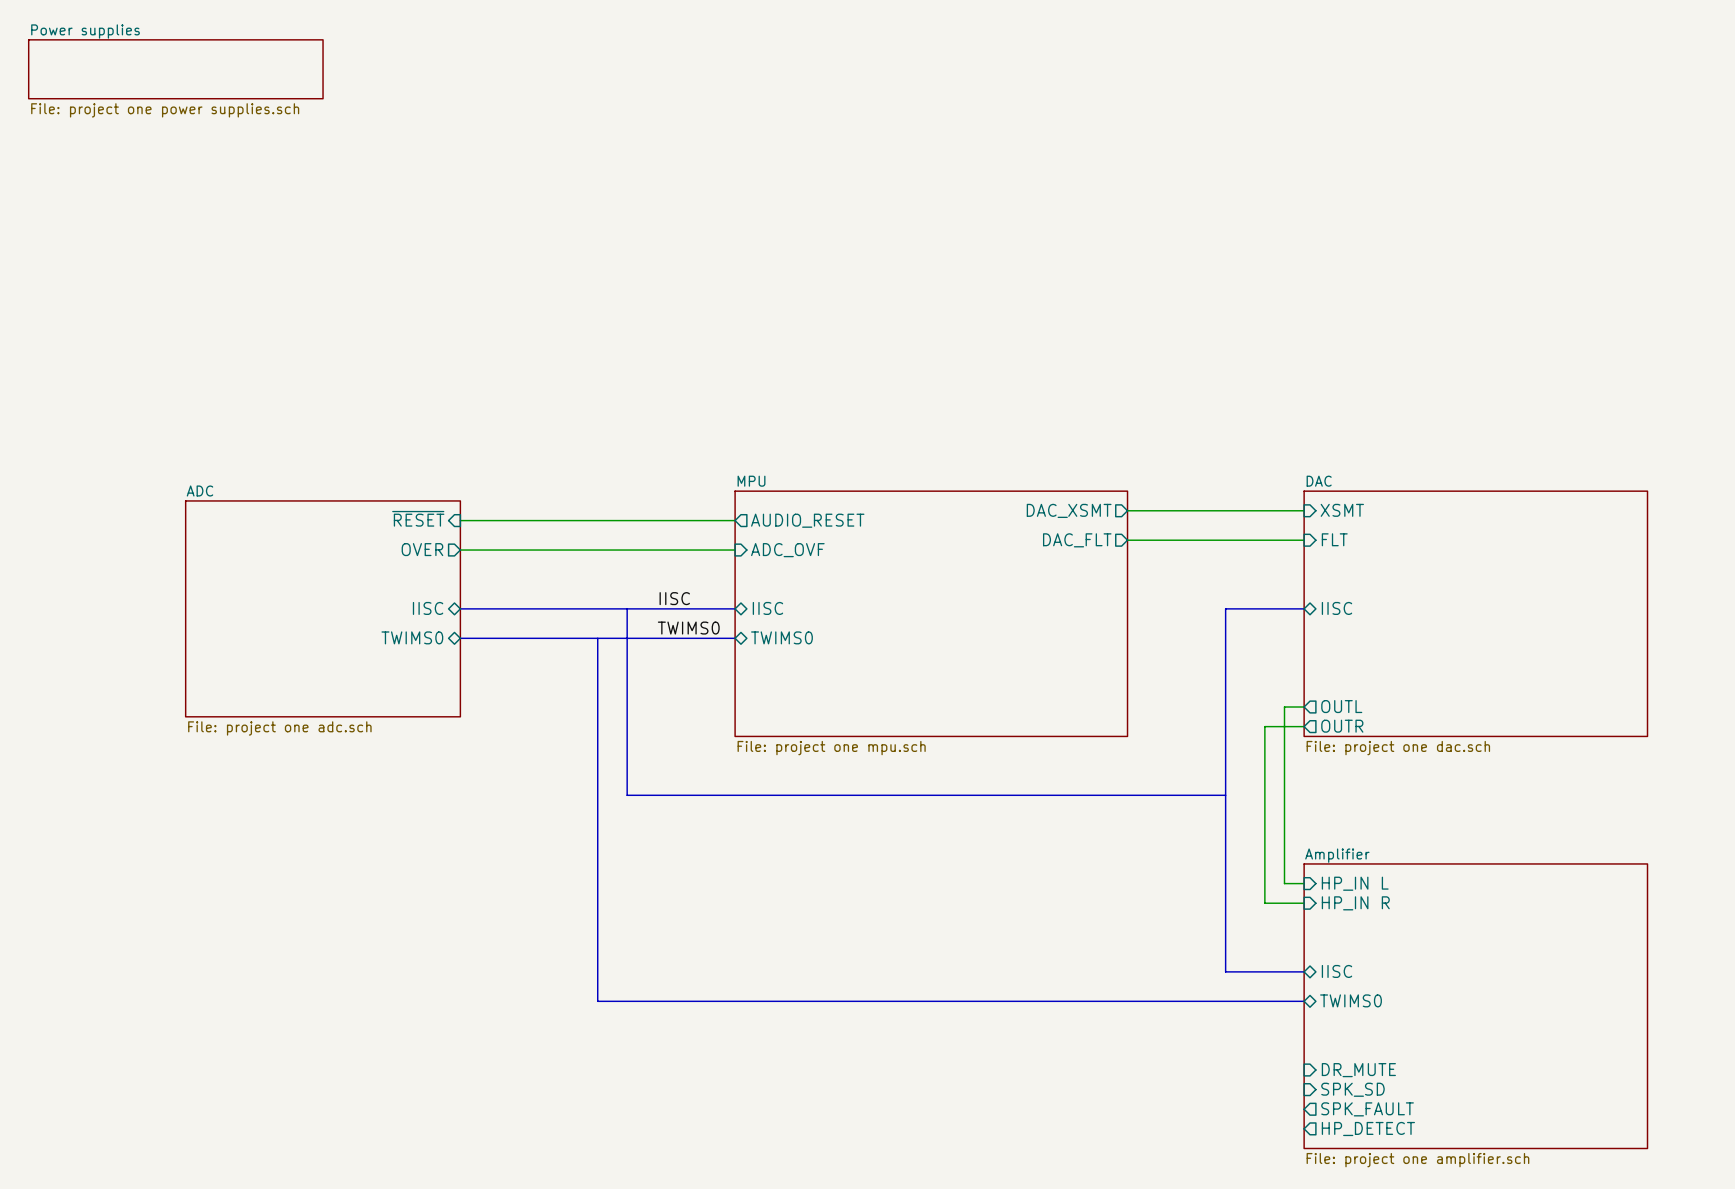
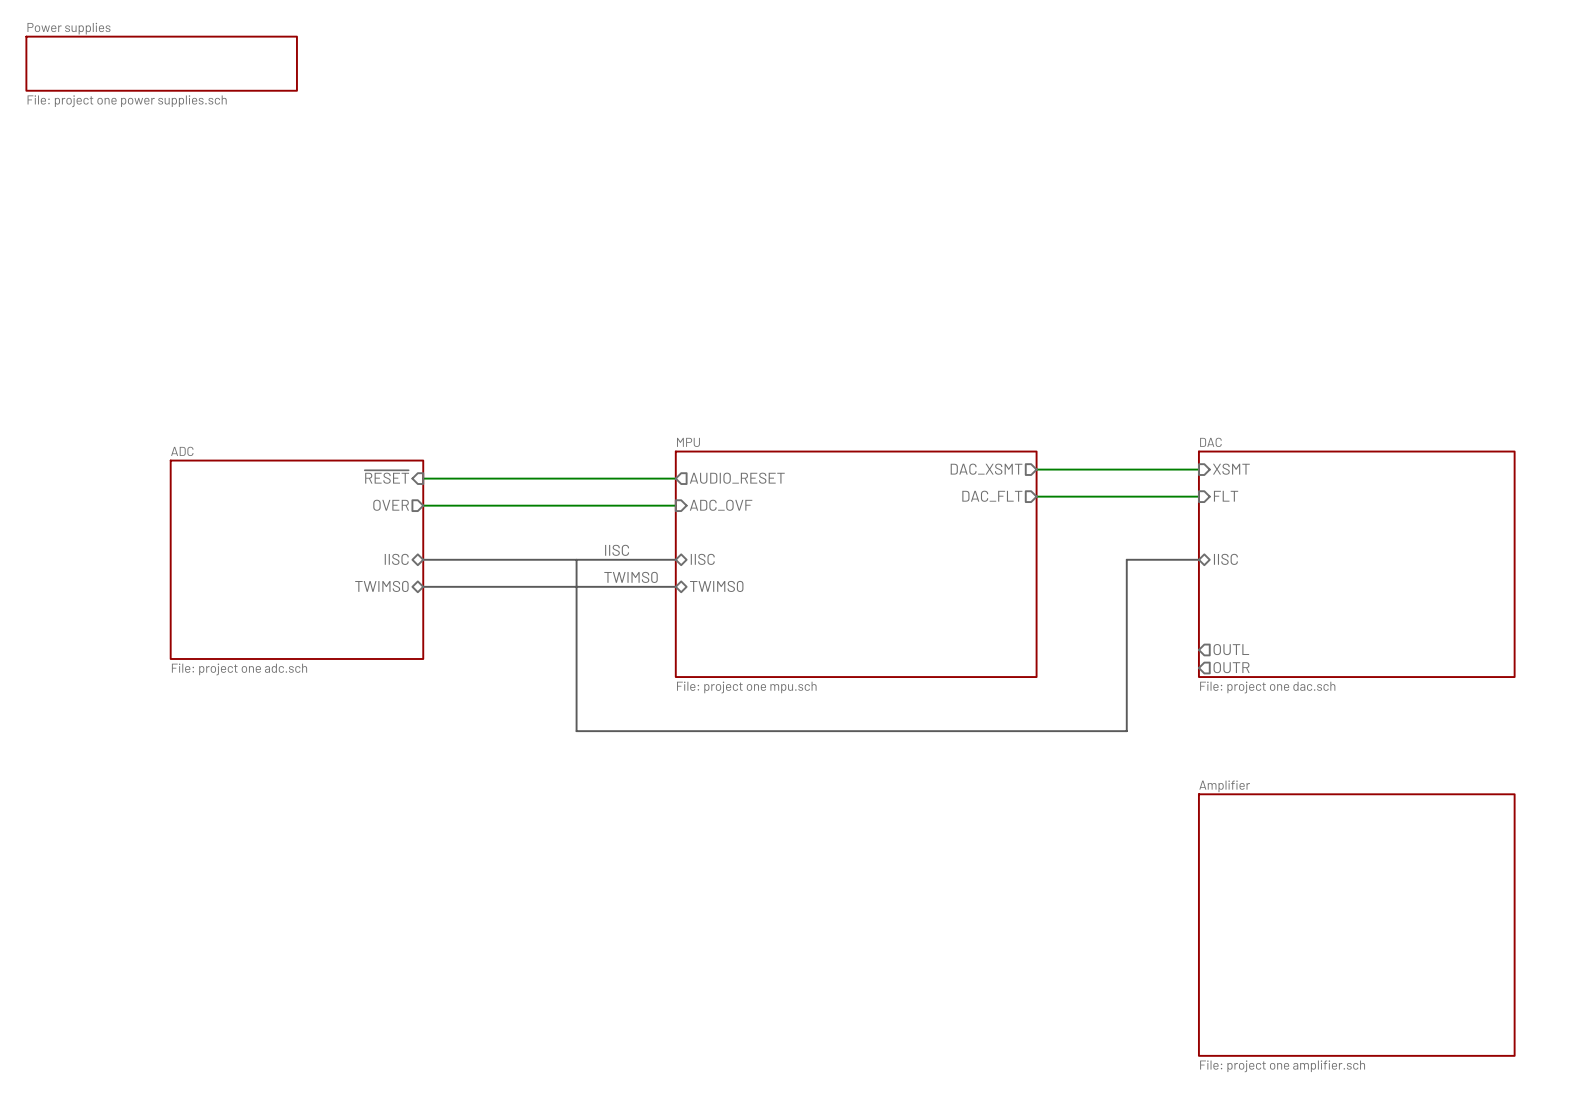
bus: (597, 638) (597, 1001) (1304, 1001) -> none
wire: (1304, 707) (1284, 707) (1284, 883) (1304, 883) -> none
wire: (1304, 726) (1264, 726) (1264, 903) (1304, 903) -> none
bus: (1225, 795) (1225, 971) (1304, 971) -> none
sheet pin: HP_IN L (1355, 883) -> none
sheet pin: HP_IN R (1355, 903) -> none
sheet pin: IISC (1336, 971) -> none
sheet pin: TWIMS0 (1351, 1000) -> none
sheet pin: DR_MUTE (1358, 1070) -> none
sheet pin: SPK_SD (1352, 1089) -> none
sheet pin: SPK_FAULT (1367, 1109) -> none
sheet pin: HP_DETECT (1368, 1128) -> none

